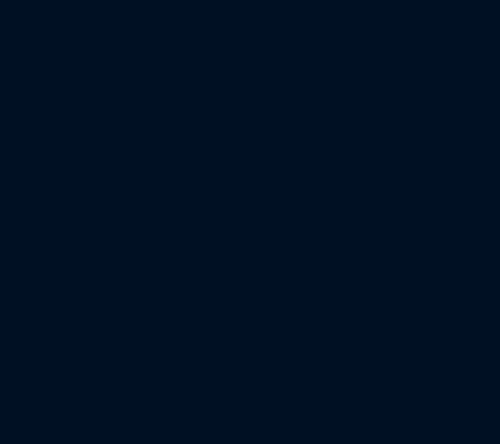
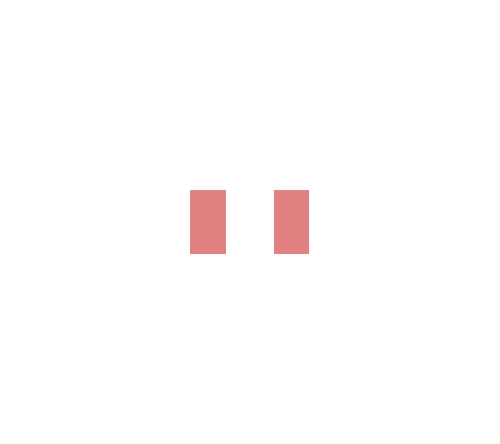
part: none -> (249, 222)

